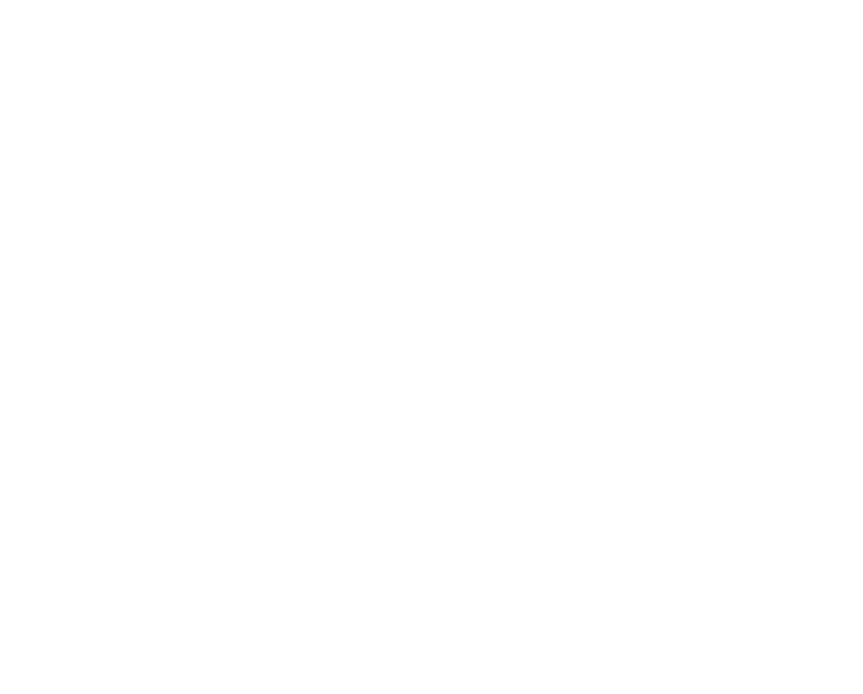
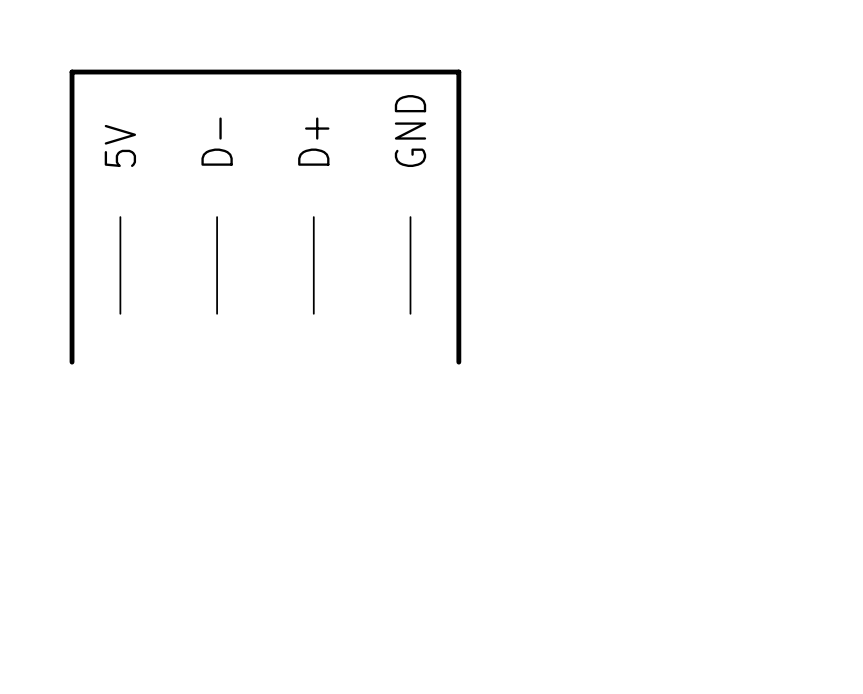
part: none -> (265, 217)

